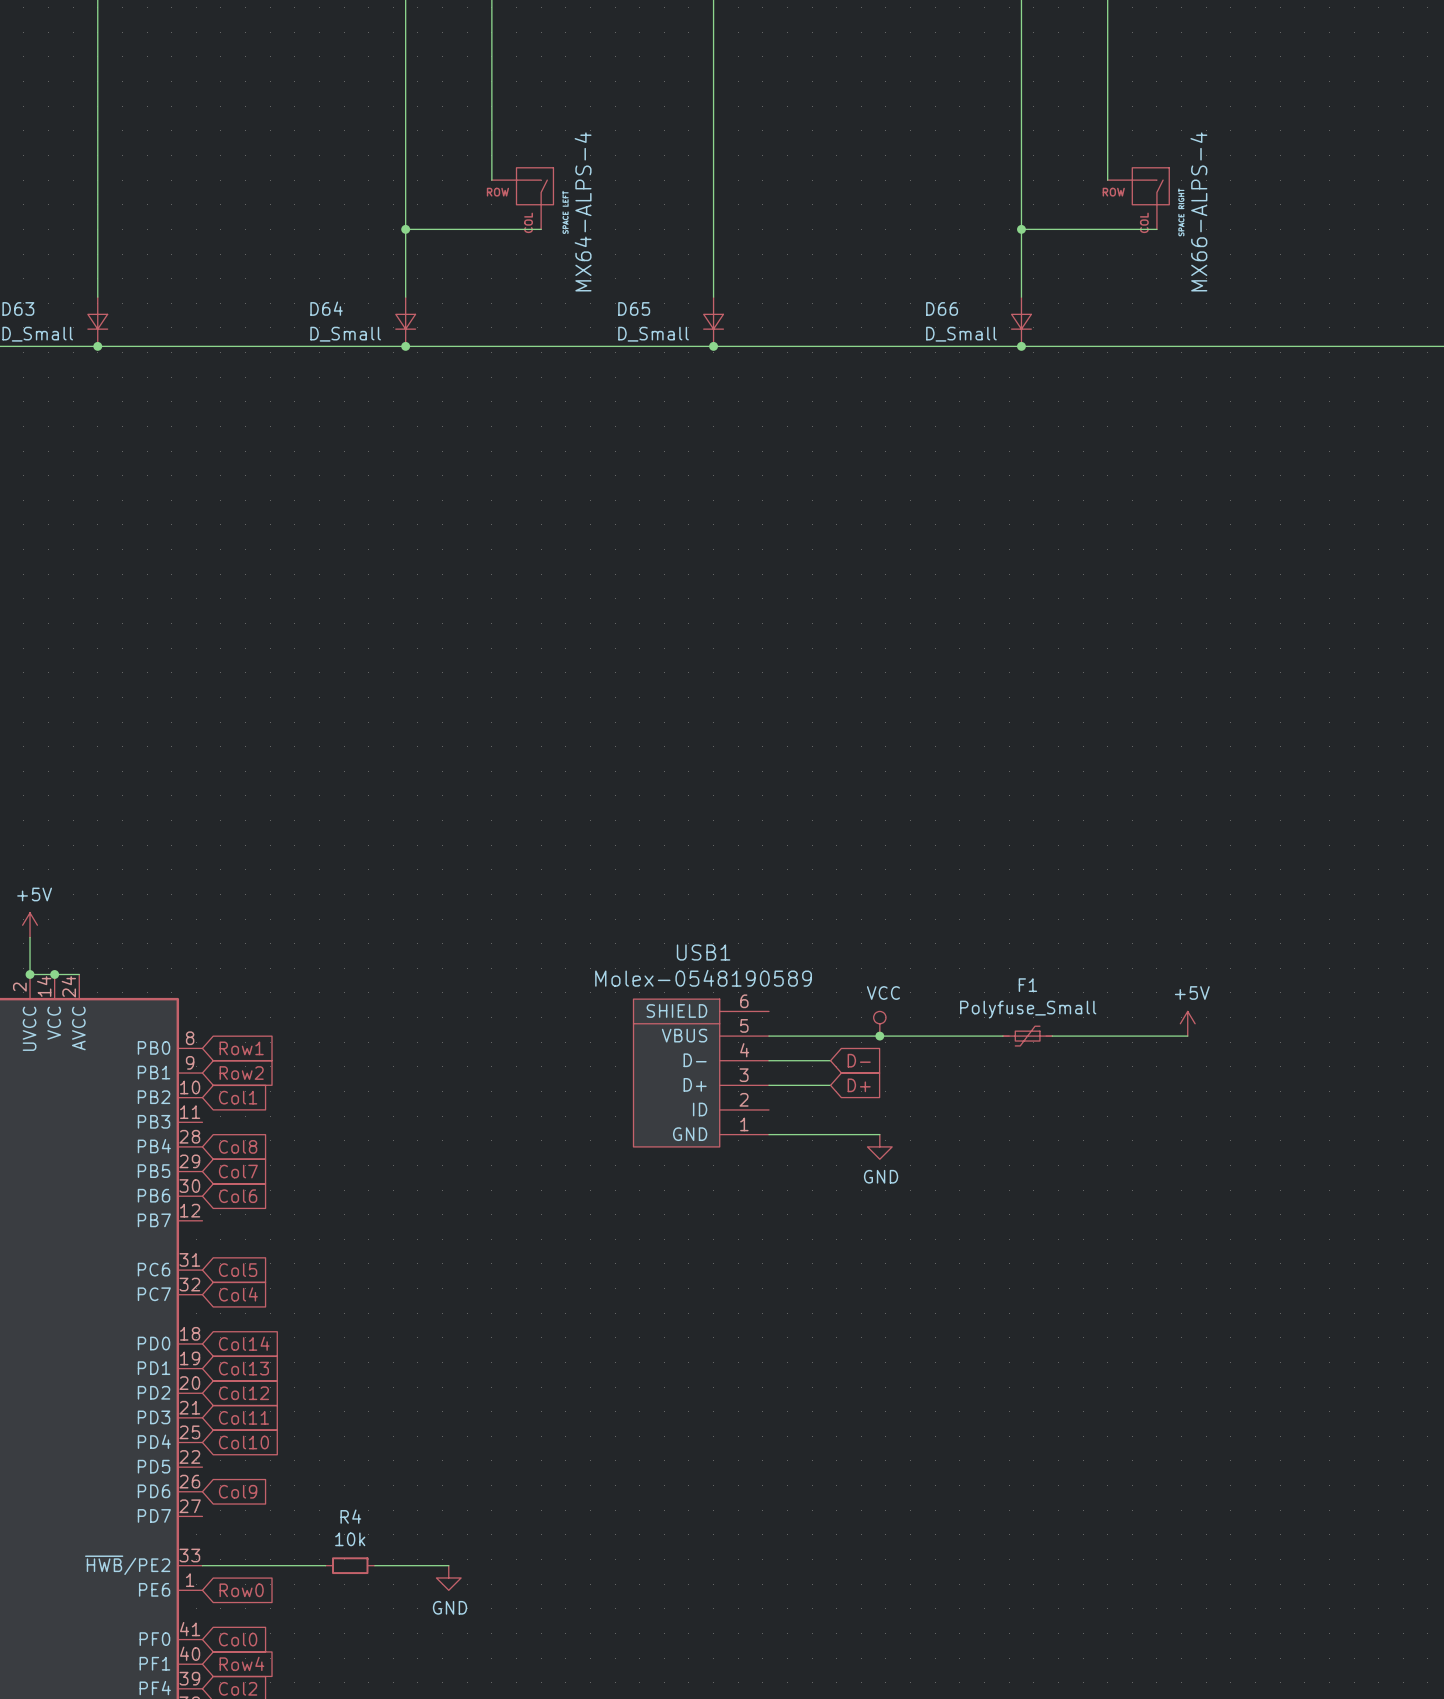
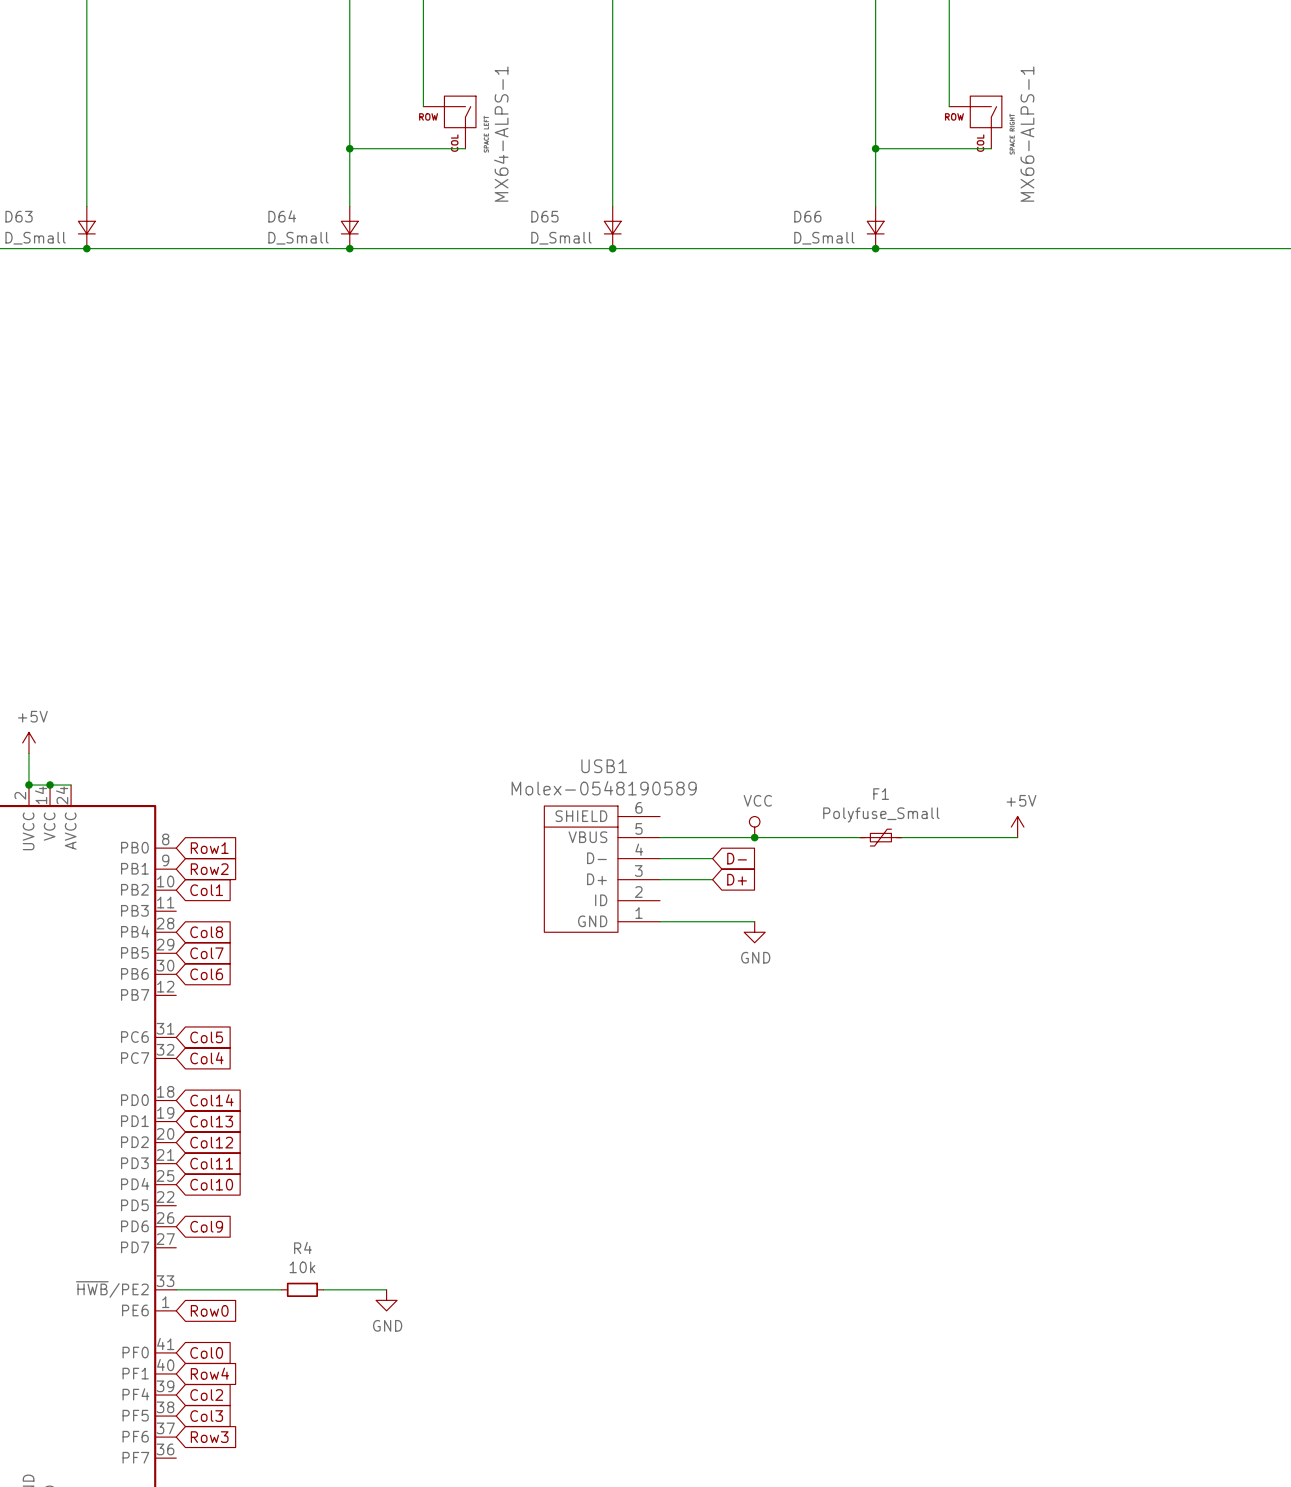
MX64-ALPS-4 name: MX64-ALPS-4 (583, 211) -> MX64-ALPS-1 (501, 134)
MX66-ALPS-4 name: MX66-ALPS-4 (1198, 211) -> MX66-ALPS-1 (1027, 134)

